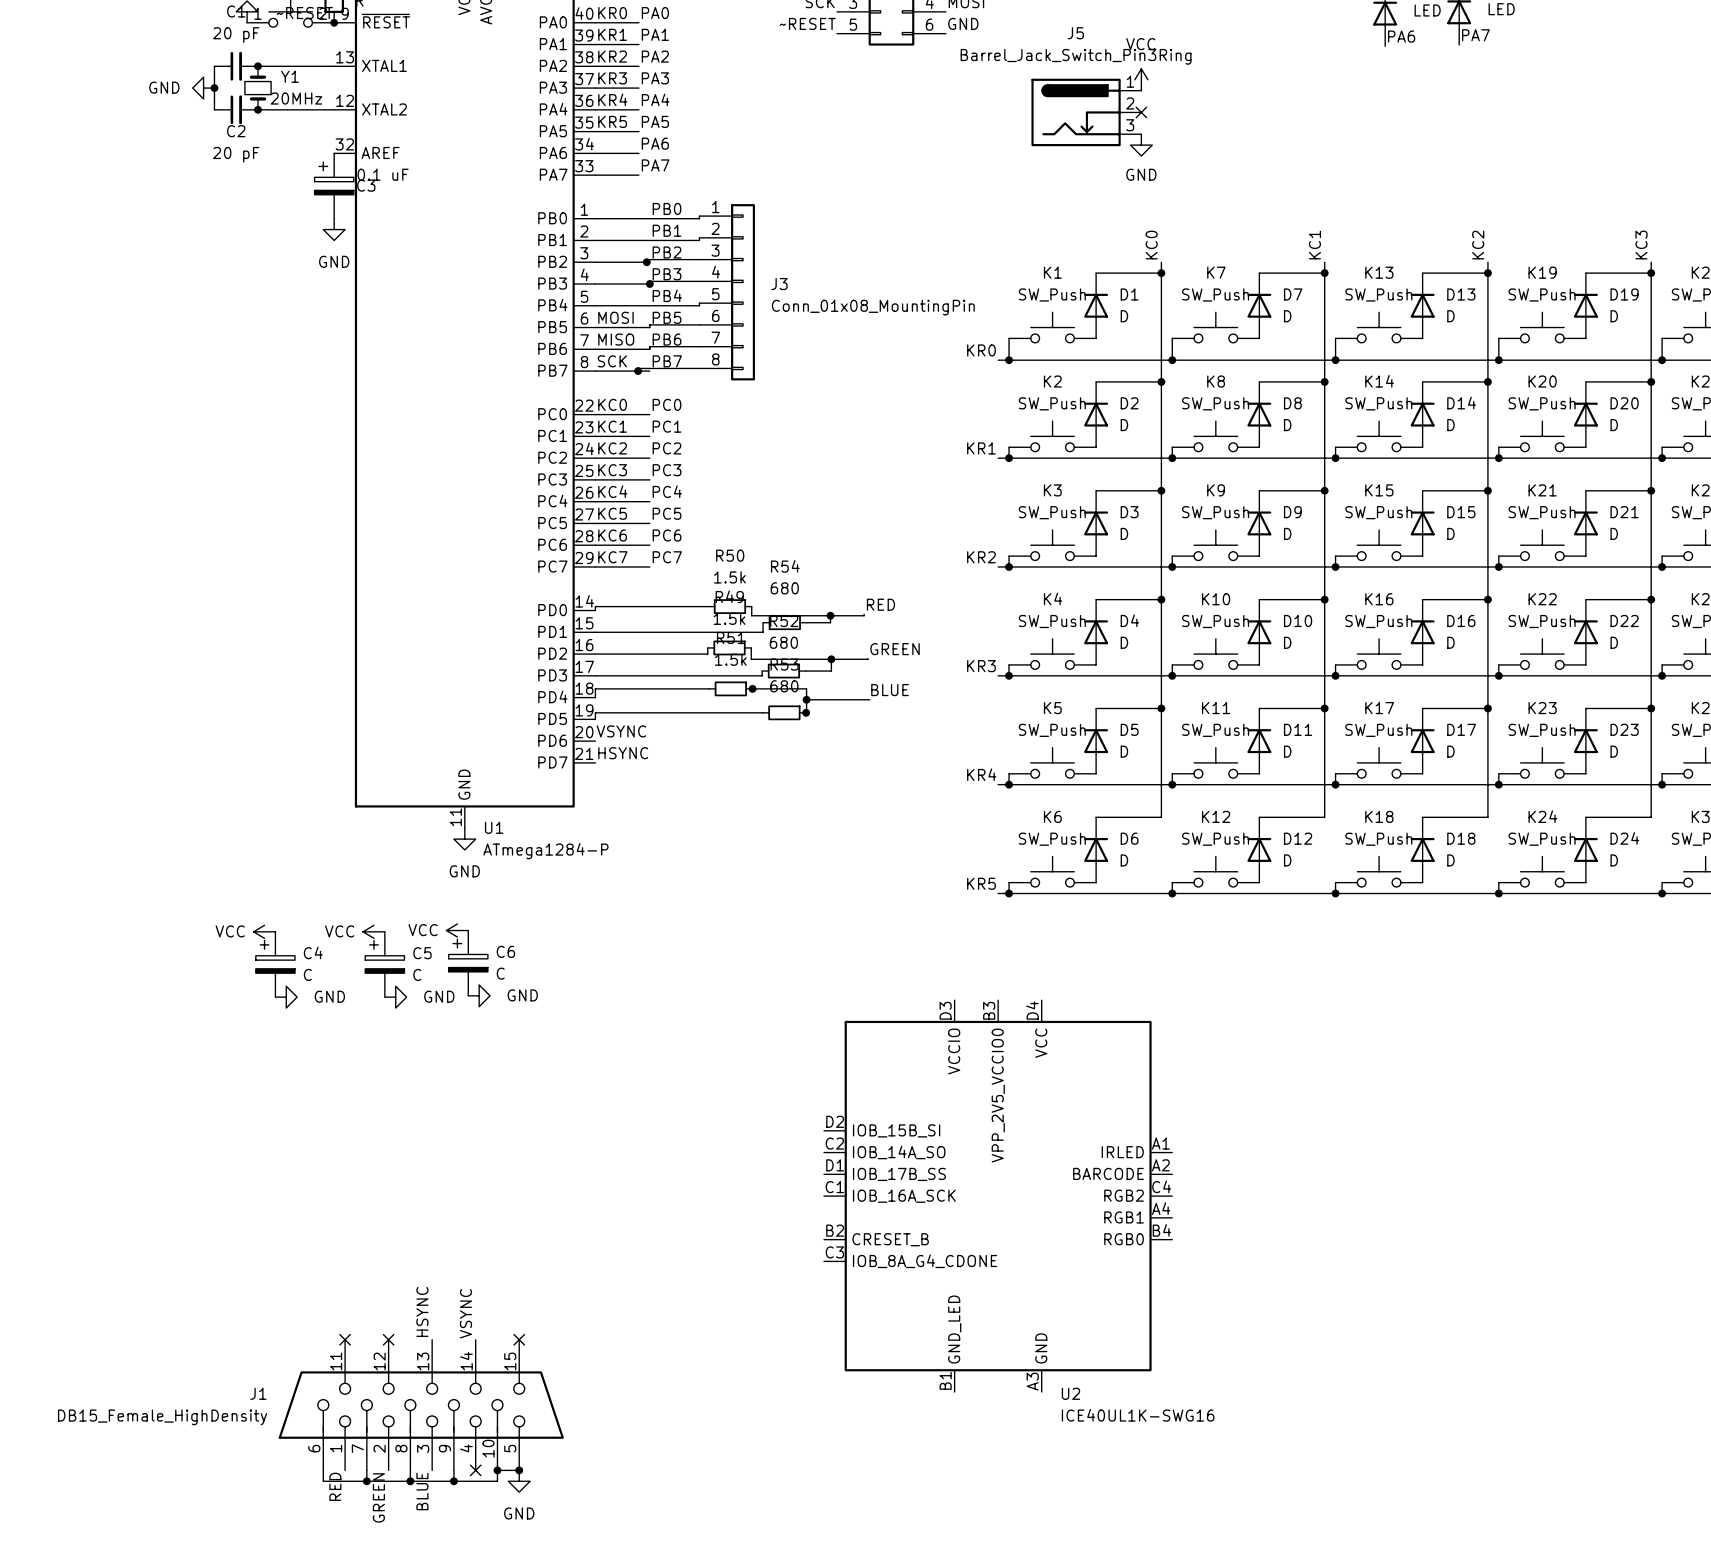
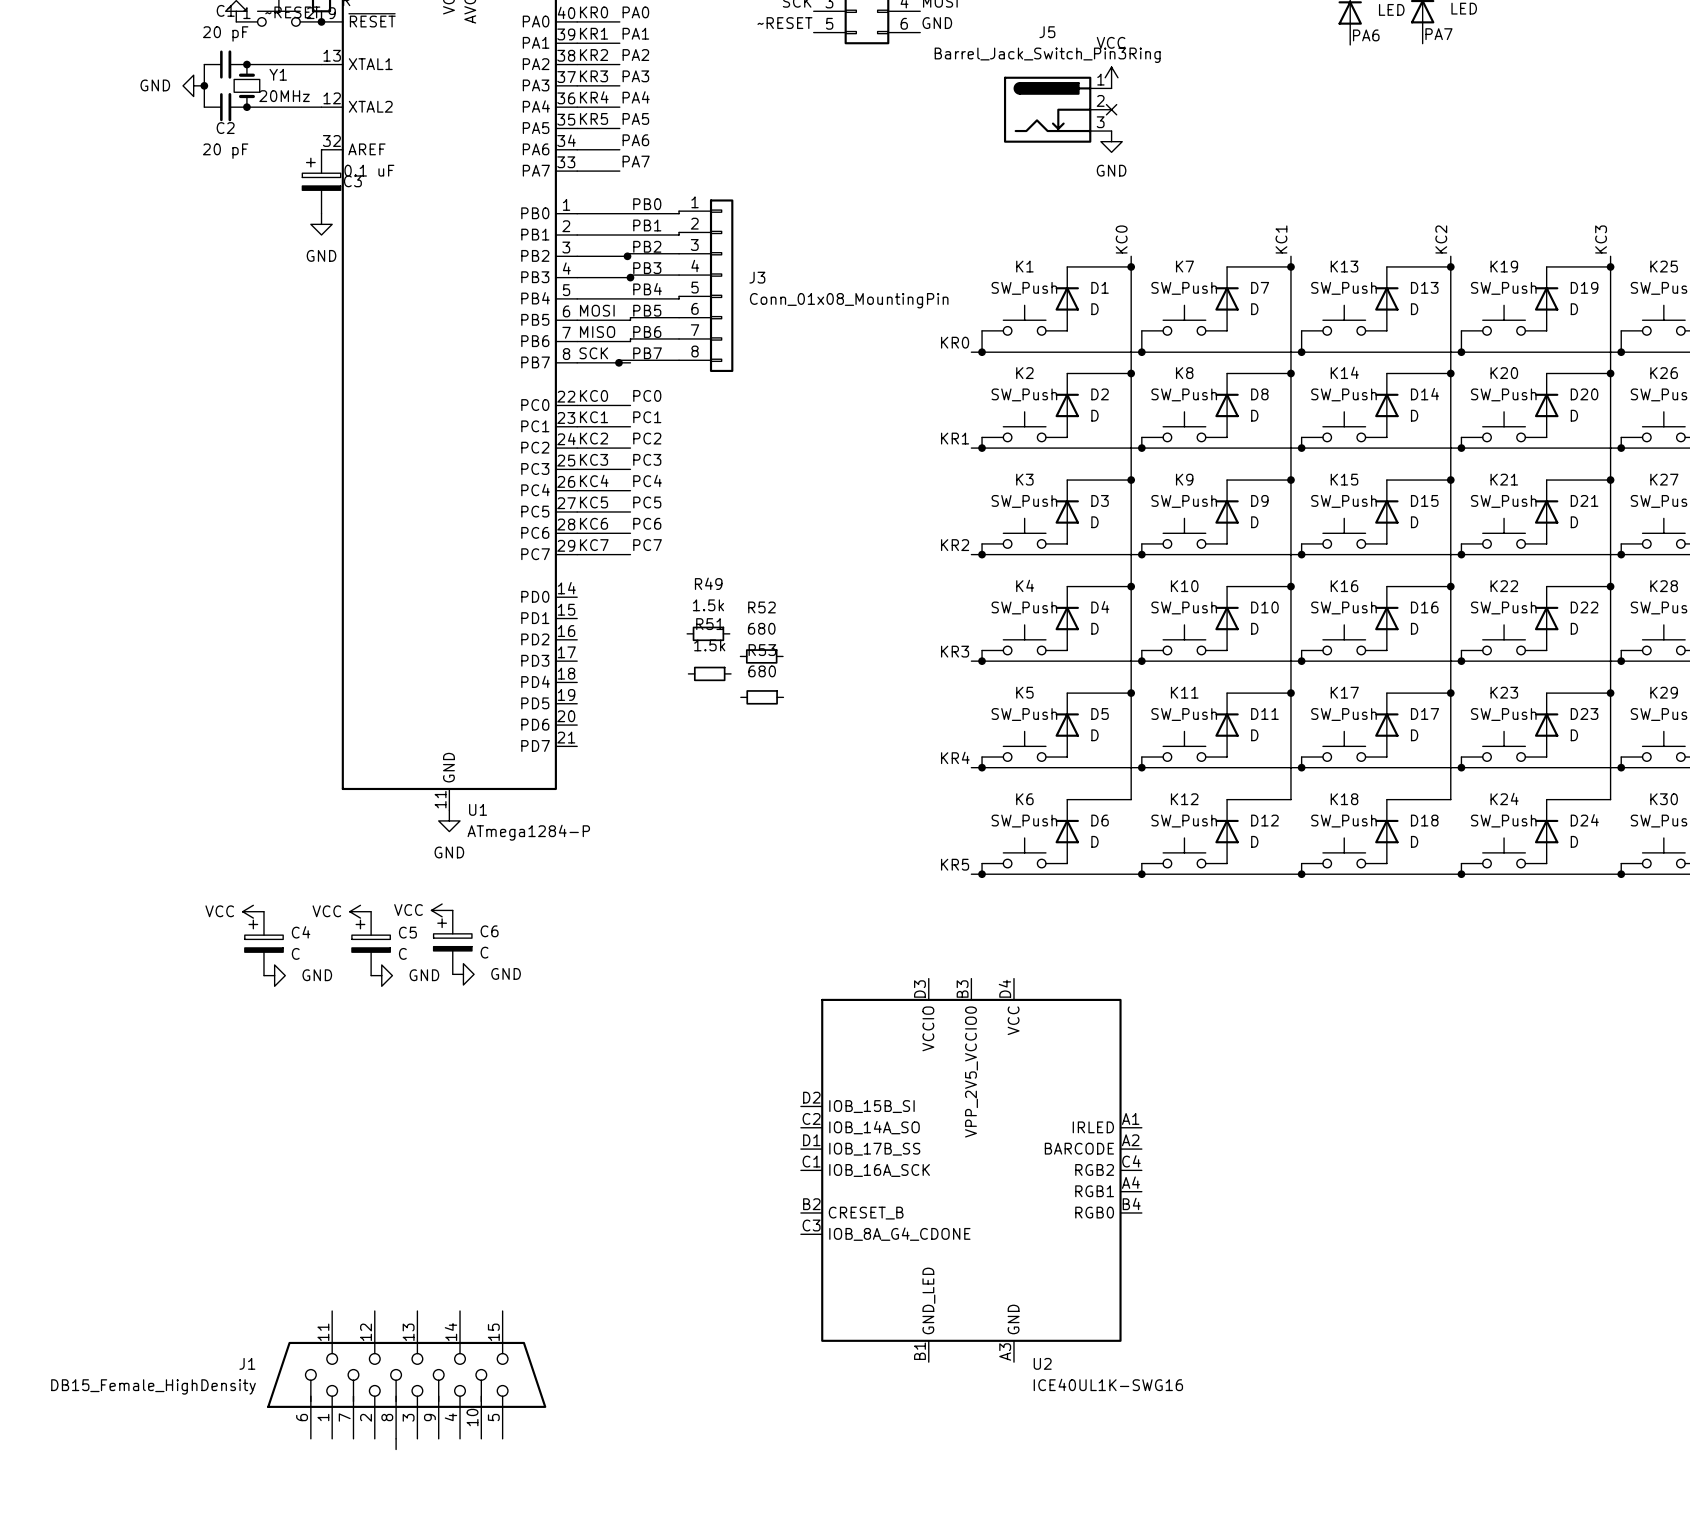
label: RED (880, 604) -> none
wire: (708, 606) (595, 606) (595, 610) -> none
R50: 1.5k (729, 606) -> none
wire: (751, 606) (751, 615) (864, 614) -> none
wire: (830, 615) (830, 622) (806, 622) -> none
junction: (830, 615) -> none
wire: (763, 622) (763, 632) (595, 632) -> none
R54: 680 (784, 622) -> none
wire: (707, 647) (707, 654) (595, 654) -> none
wire: (751, 647) (751, 659) (867, 658) -> none
label: GREEN (894, 649) -> none
wire: (831, 659) (831, 671) (805, 671) -> none
junction: (831, 659) -> none
wire: (762, 671) (762, 675) (595, 675) -> none
wire: (709, 688) (595, 688) (595, 697) -> none
wire: (752, 688) (806, 688) (806, 712) (804, 712) -> none
junction: (752, 688) -> none
label: BLUE (889, 690) -> none
wire: (806, 699) (869, 699) -> none
junction: (806, 699) -> none
wire: (762, 712) (595, 712) (595, 719) -> none
junction: (806, 712) -> none
label: VSYNC (621, 731) -> none
label: HSYNC (623, 753) -> none
label: HSYNC (422, 1311) -> none
label: VSYNC (465, 1313) -> none
no-connect mark: (345, 1339) -> none
no-connect mark: (388, 1339) -> none
no-connect mark: (519, 1339) -> none
wire: (323, 1470) (323, 1481) (497, 1481) (497, 1470) (519, 1470) -> none
wire: (366, 1470) (366, 1481) -> none
wire: (453, 1470) (453, 1481) -> none
no-connect mark: (475, 1470) -> none
junction: (497, 1470) -> none
junction: (519, 1470) -> none
junction: (366, 1481) -> none
junction: (410, 1481) -> none
junction: (453, 1481) -> none
power symbol: GND (519, 1481) -> none
label: RED (335, 1486) -> none
label: BLUE (422, 1491) -> none
label: GREEN (378, 1497) -> none

